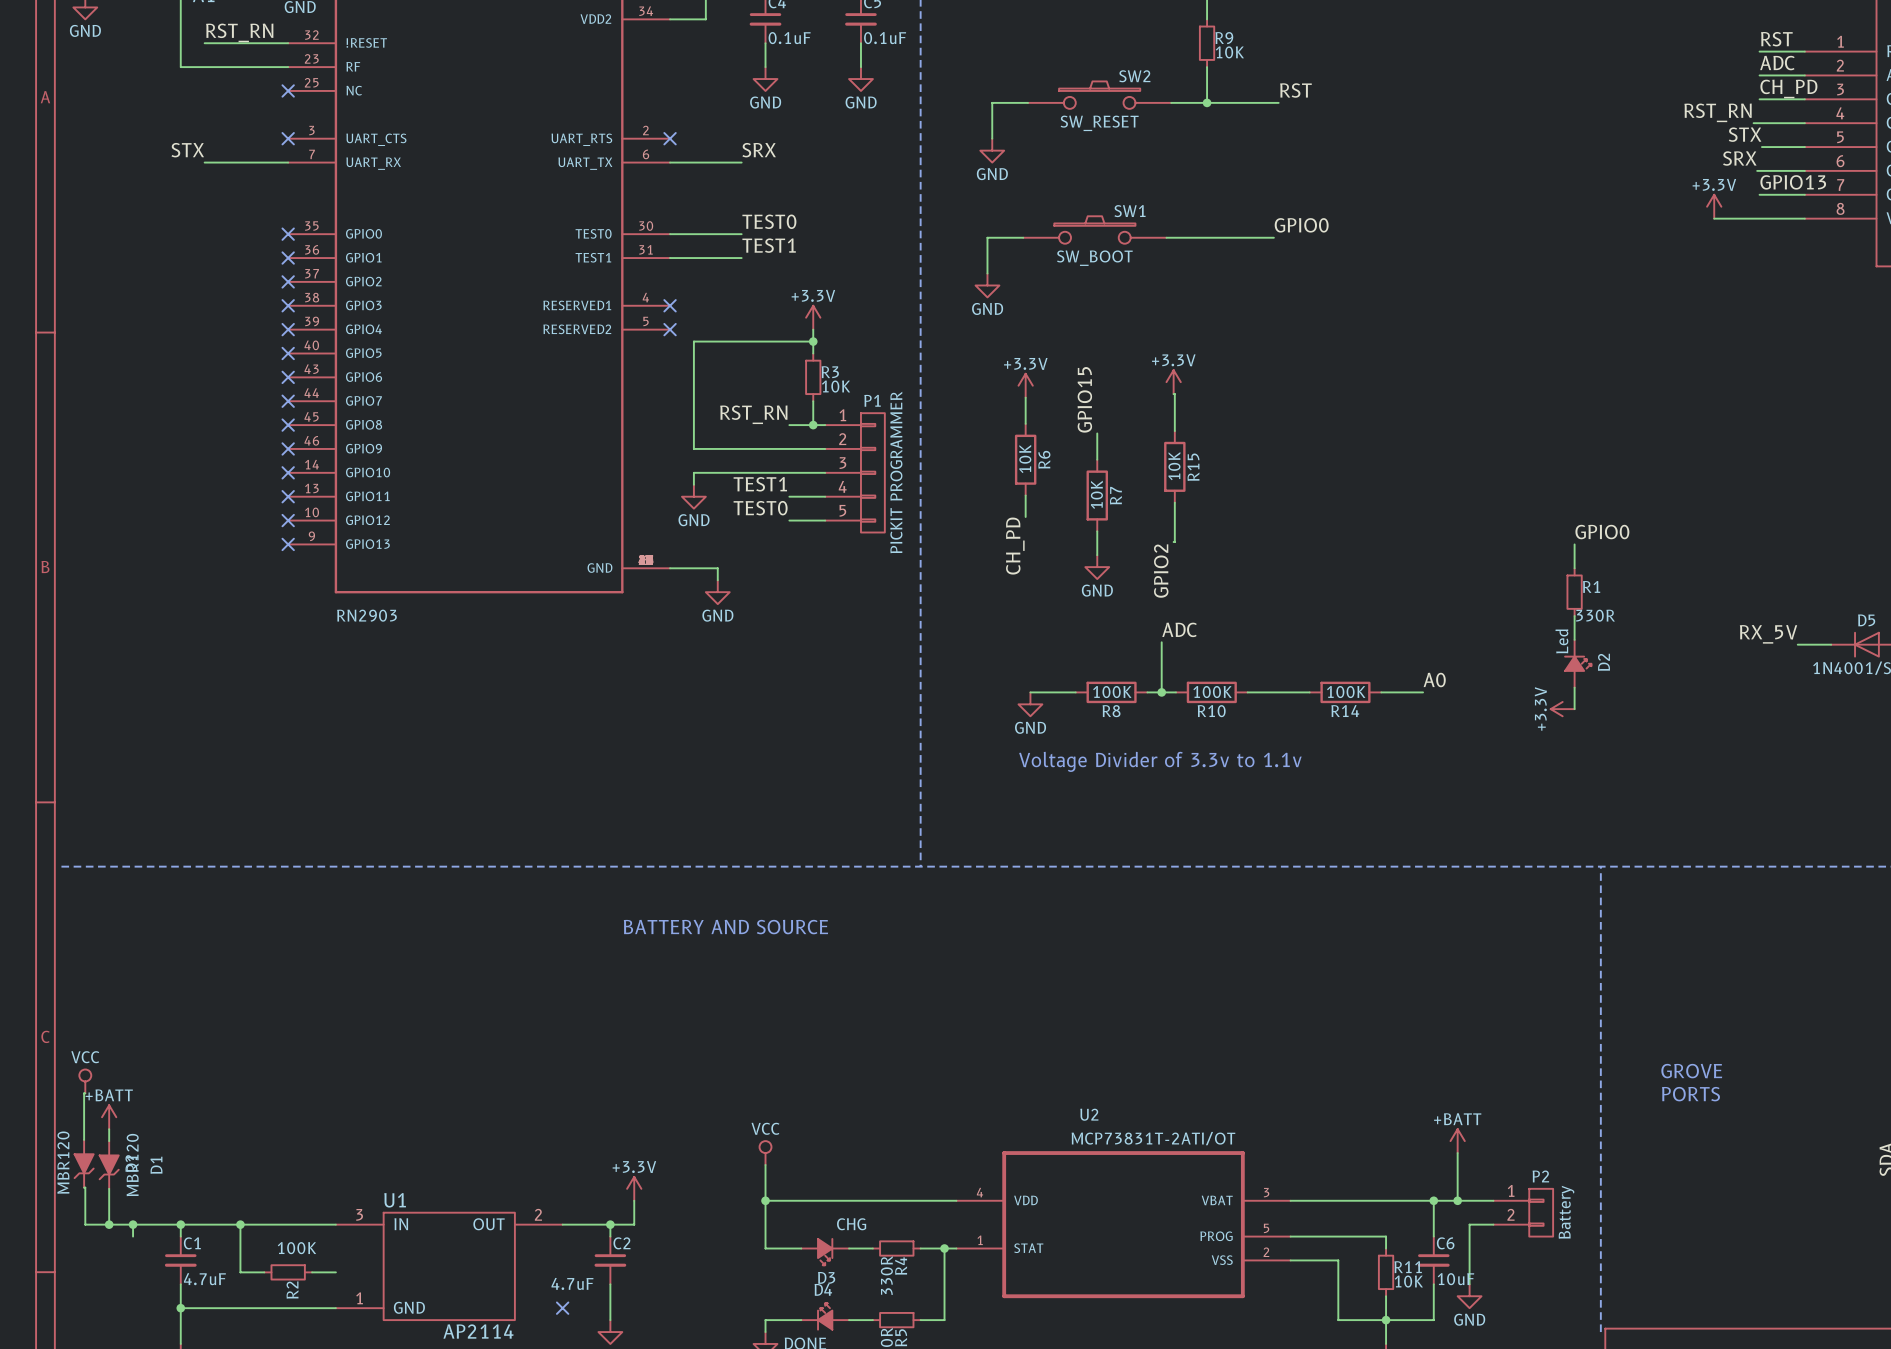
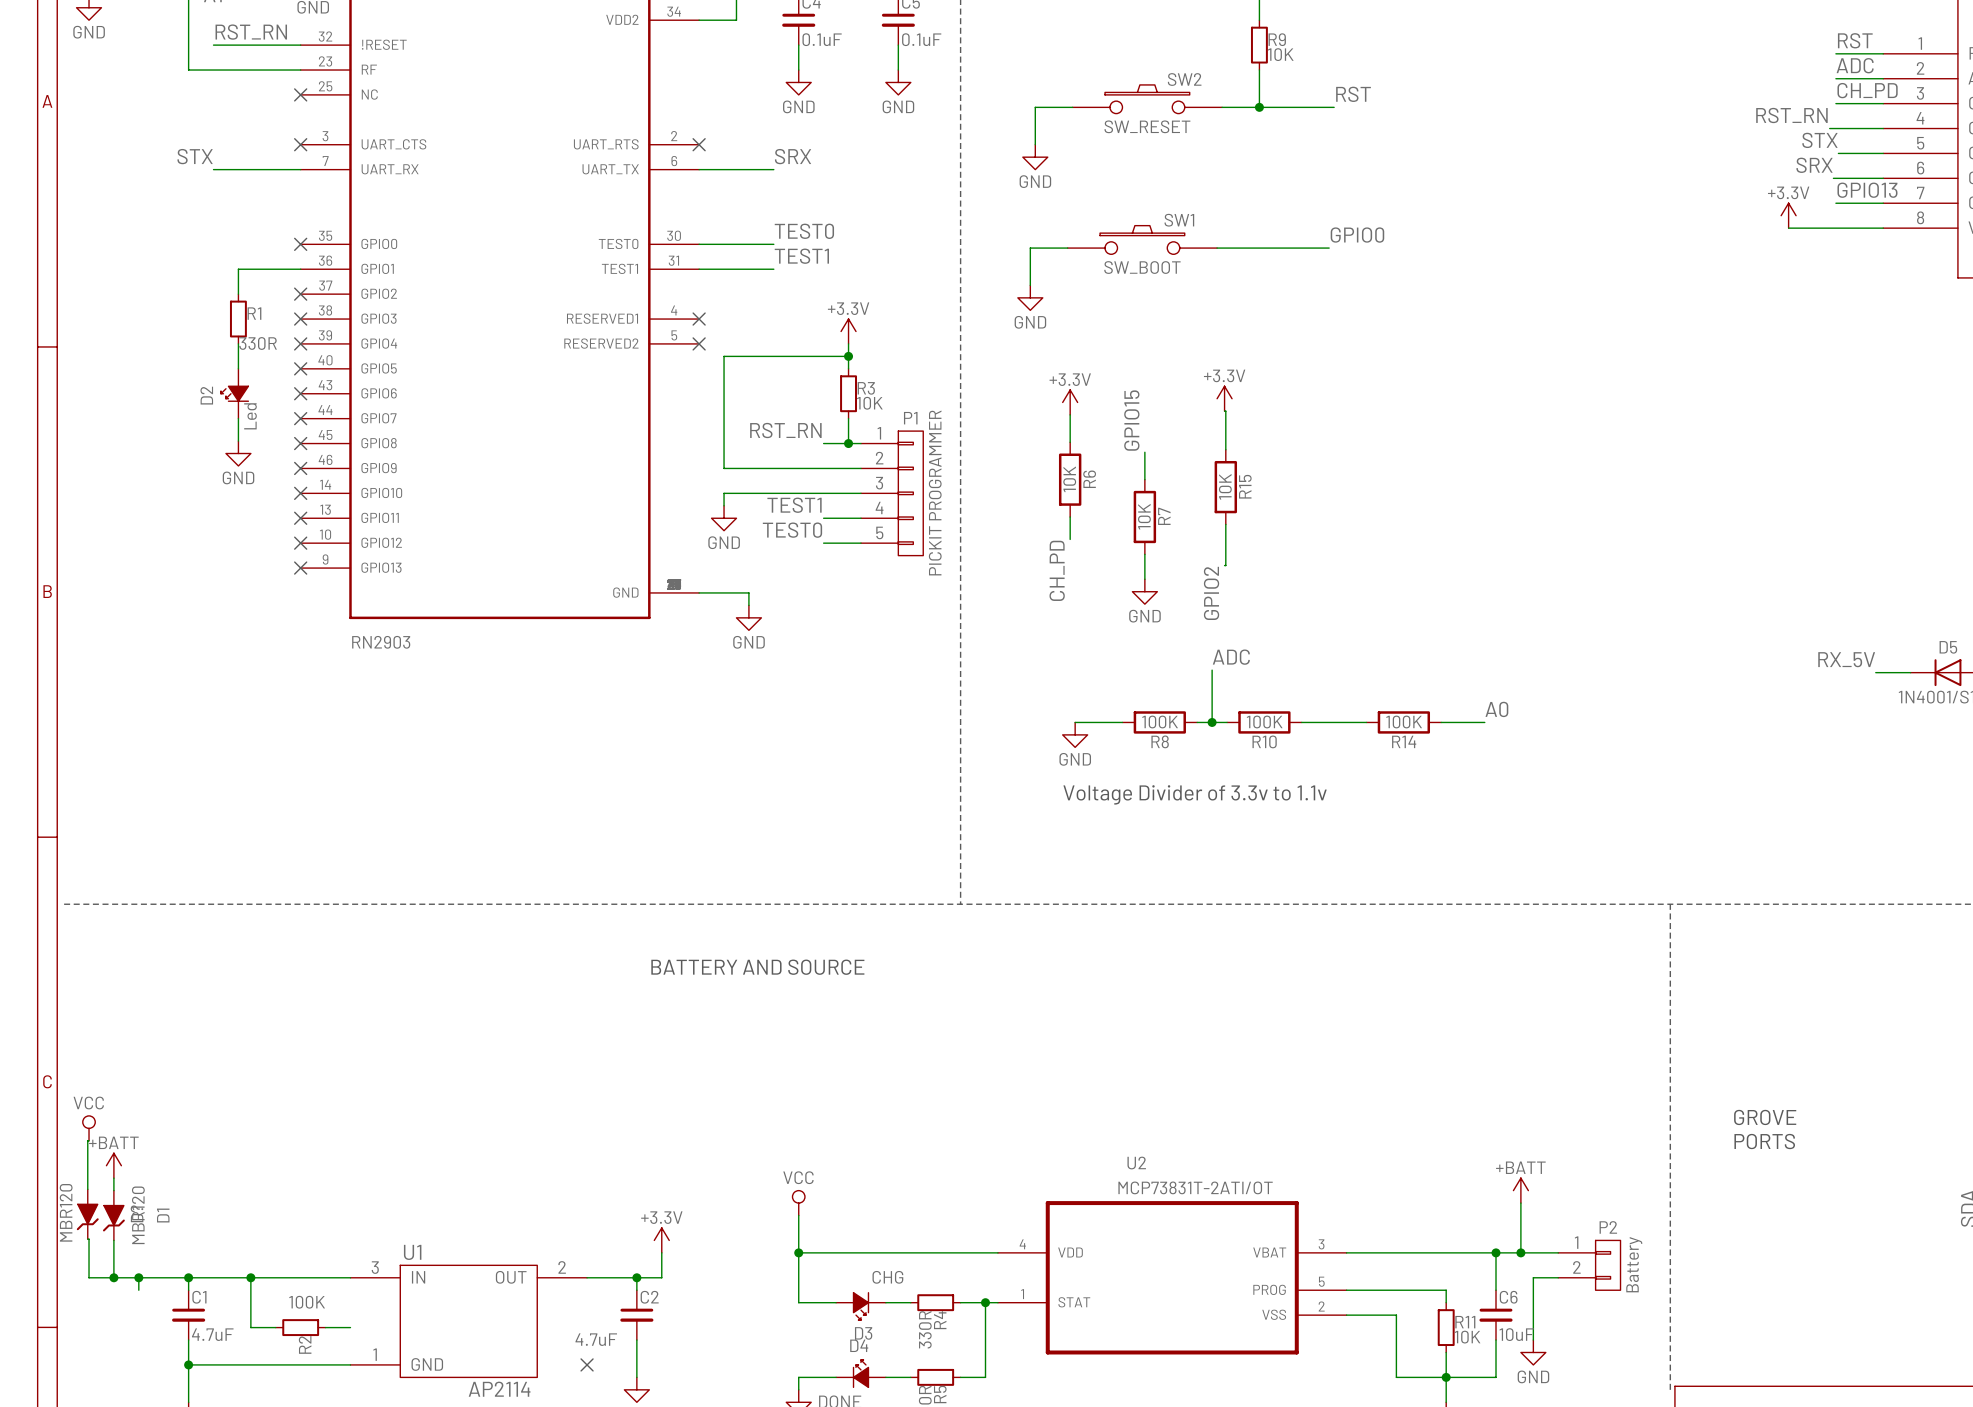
wire: none -> (300, 269) (238, 269) (238, 294)
no-connect mark: (288, 258) -> none
wire: none -> (238, 343) (238, 368)
wire: none -> (238, 418) (238, 441)
power symbol: none -> GND (238, 453)
label: GPIO0 (1602, 532) -> none
wire: (1574, 544) (1574, 568) -> none
R1 position: (1574, 592) -> (238, 319)
wire: (1574, 616) (1574, 639) -> none
D2 rotation: 0° (1578, 663) -> 180° (234, 393)
D2 position: (1578, 663) -> (234, 393)
wire: (1574, 687) (1574, 709) -> none
power symbol: +3.3V (1562, 709) -> none

